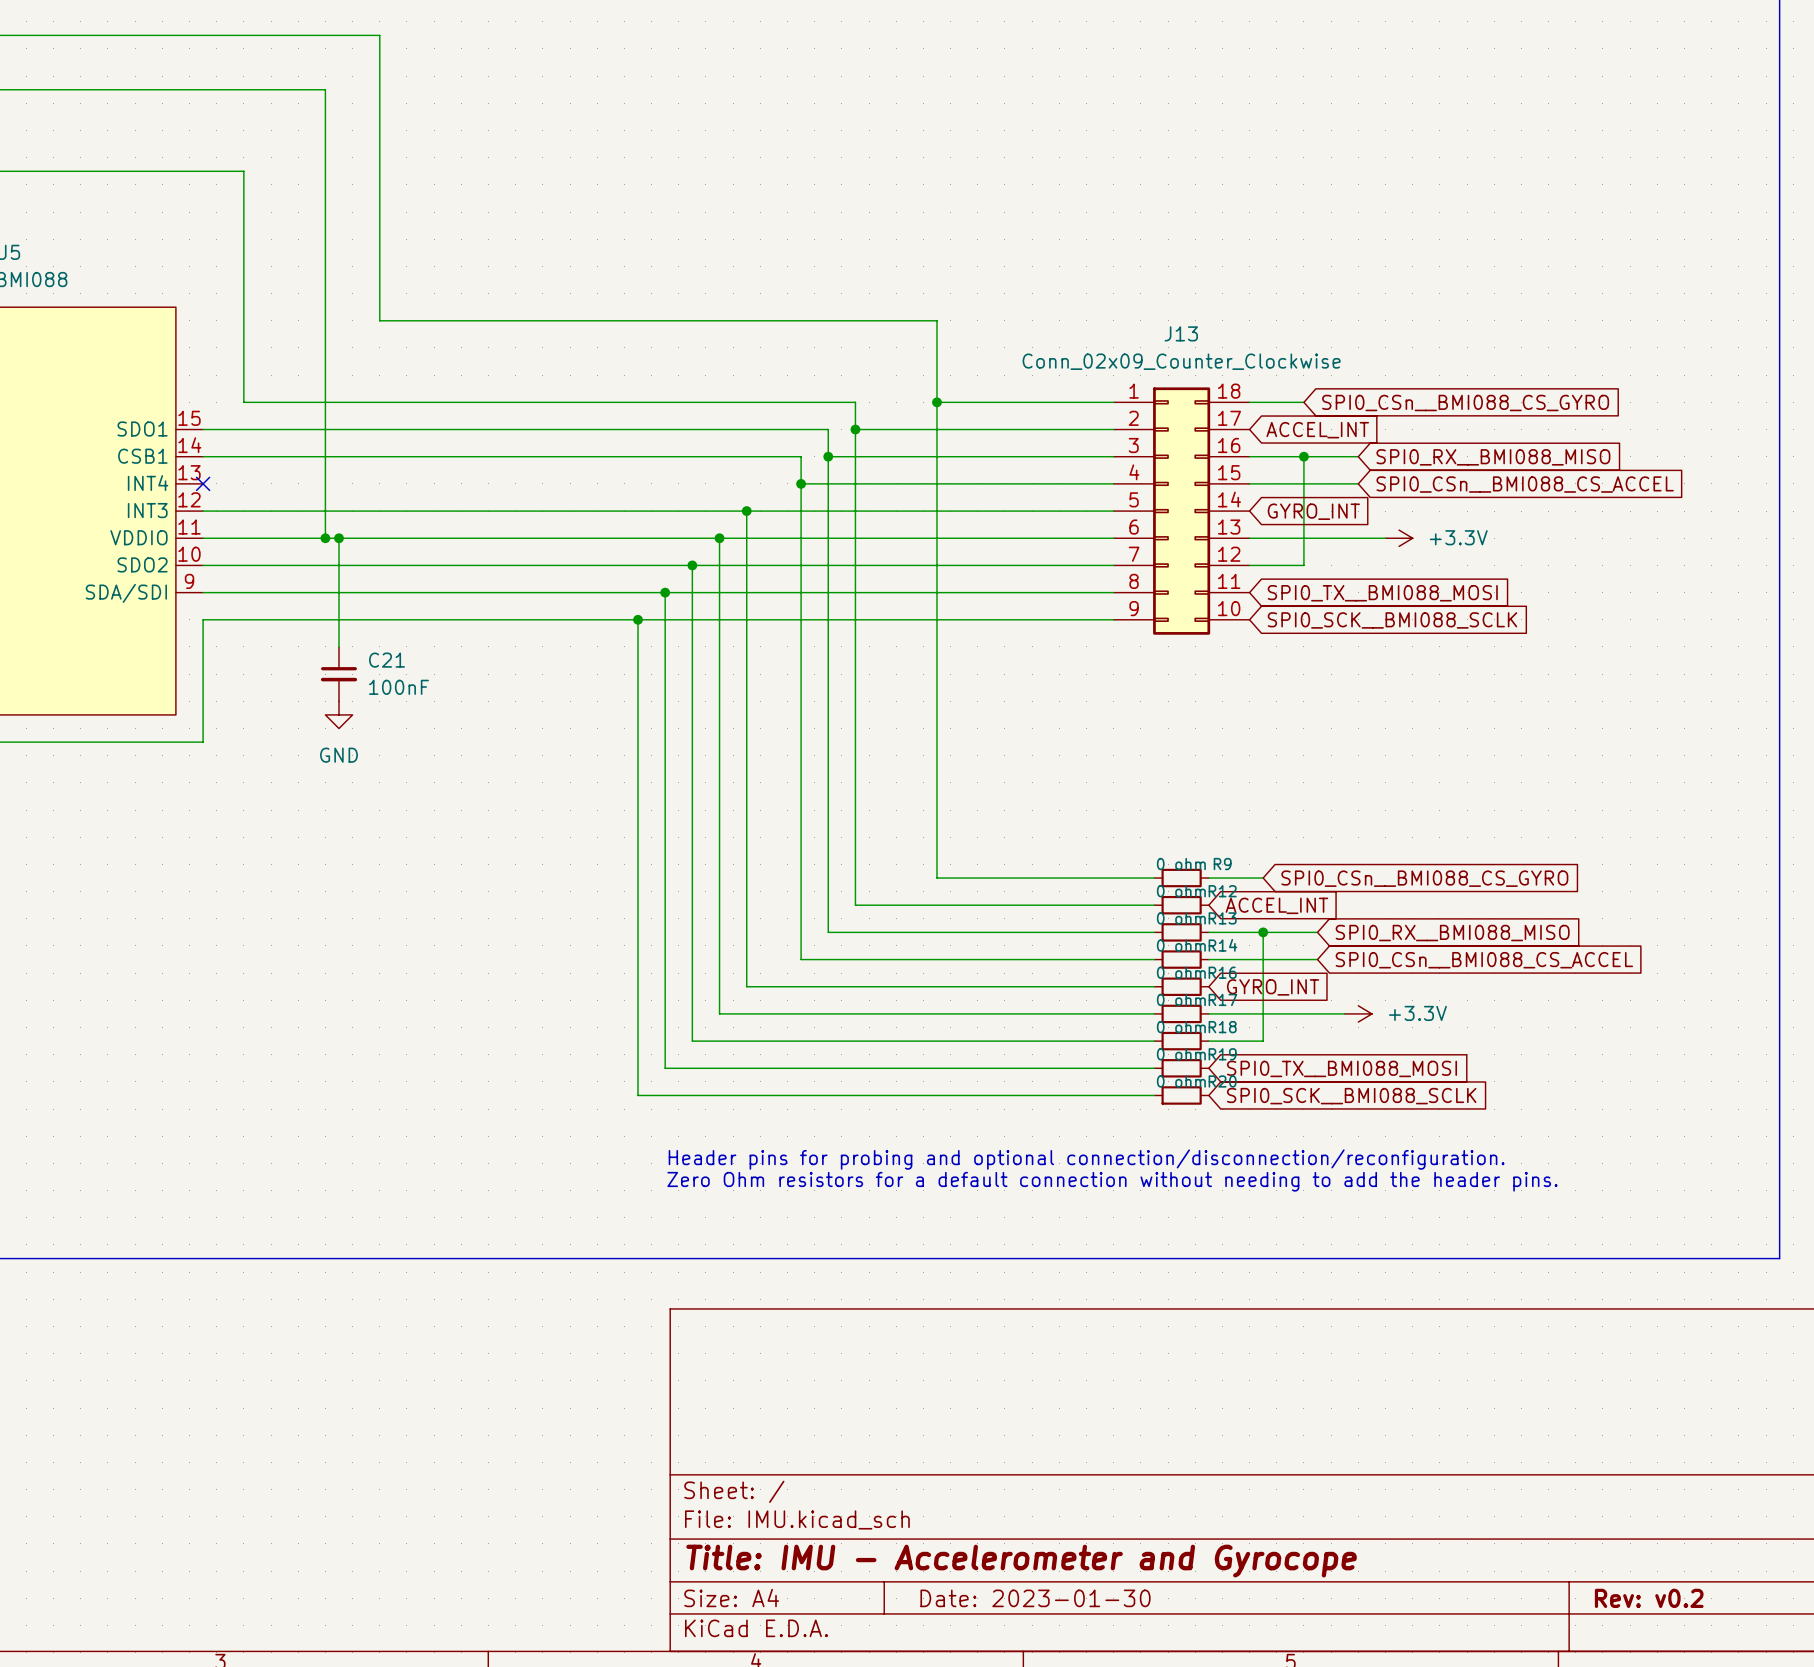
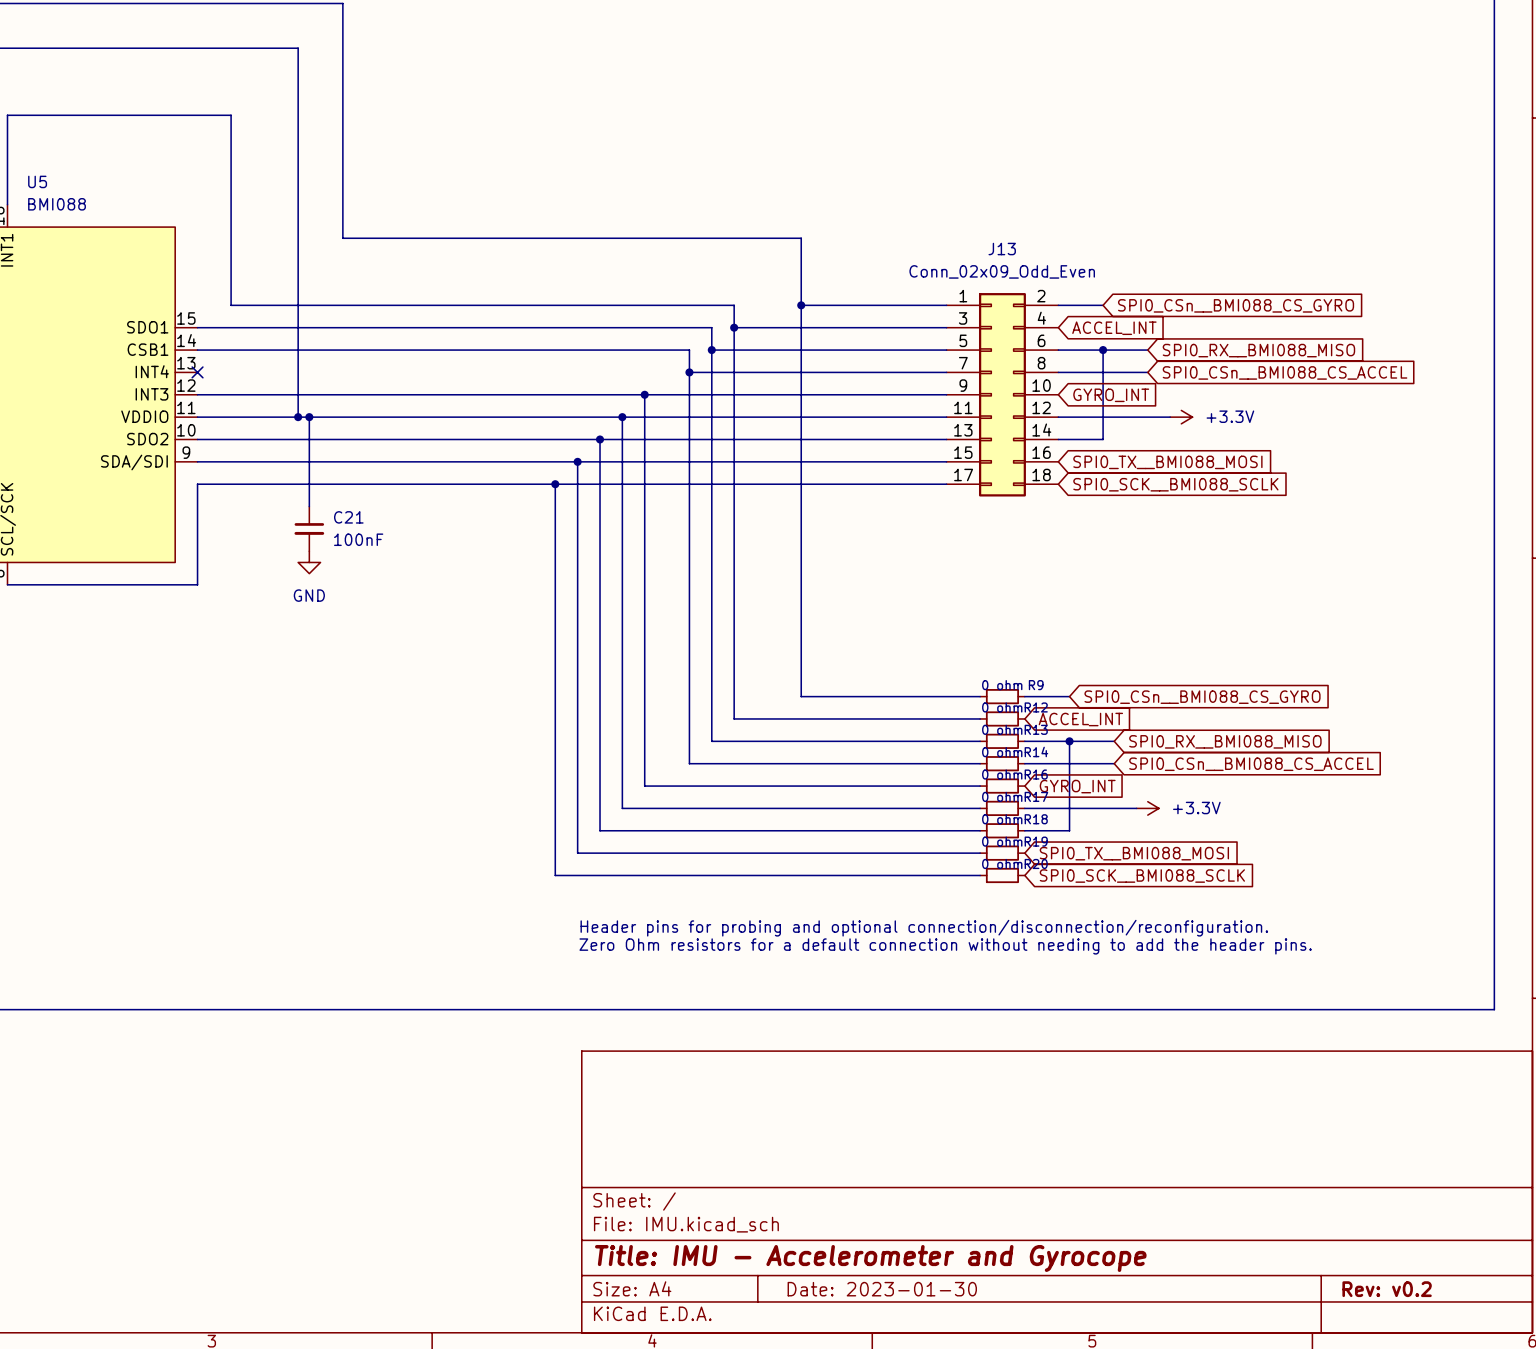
J13 value: Conn_02x09_Counter_Clockwise (1181, 361) -> Conn_02x09_Odd_Even (1002, 271)
J13 symbol: [1113, 387, 1250, 635] -> [946, 293, 1059, 497]

